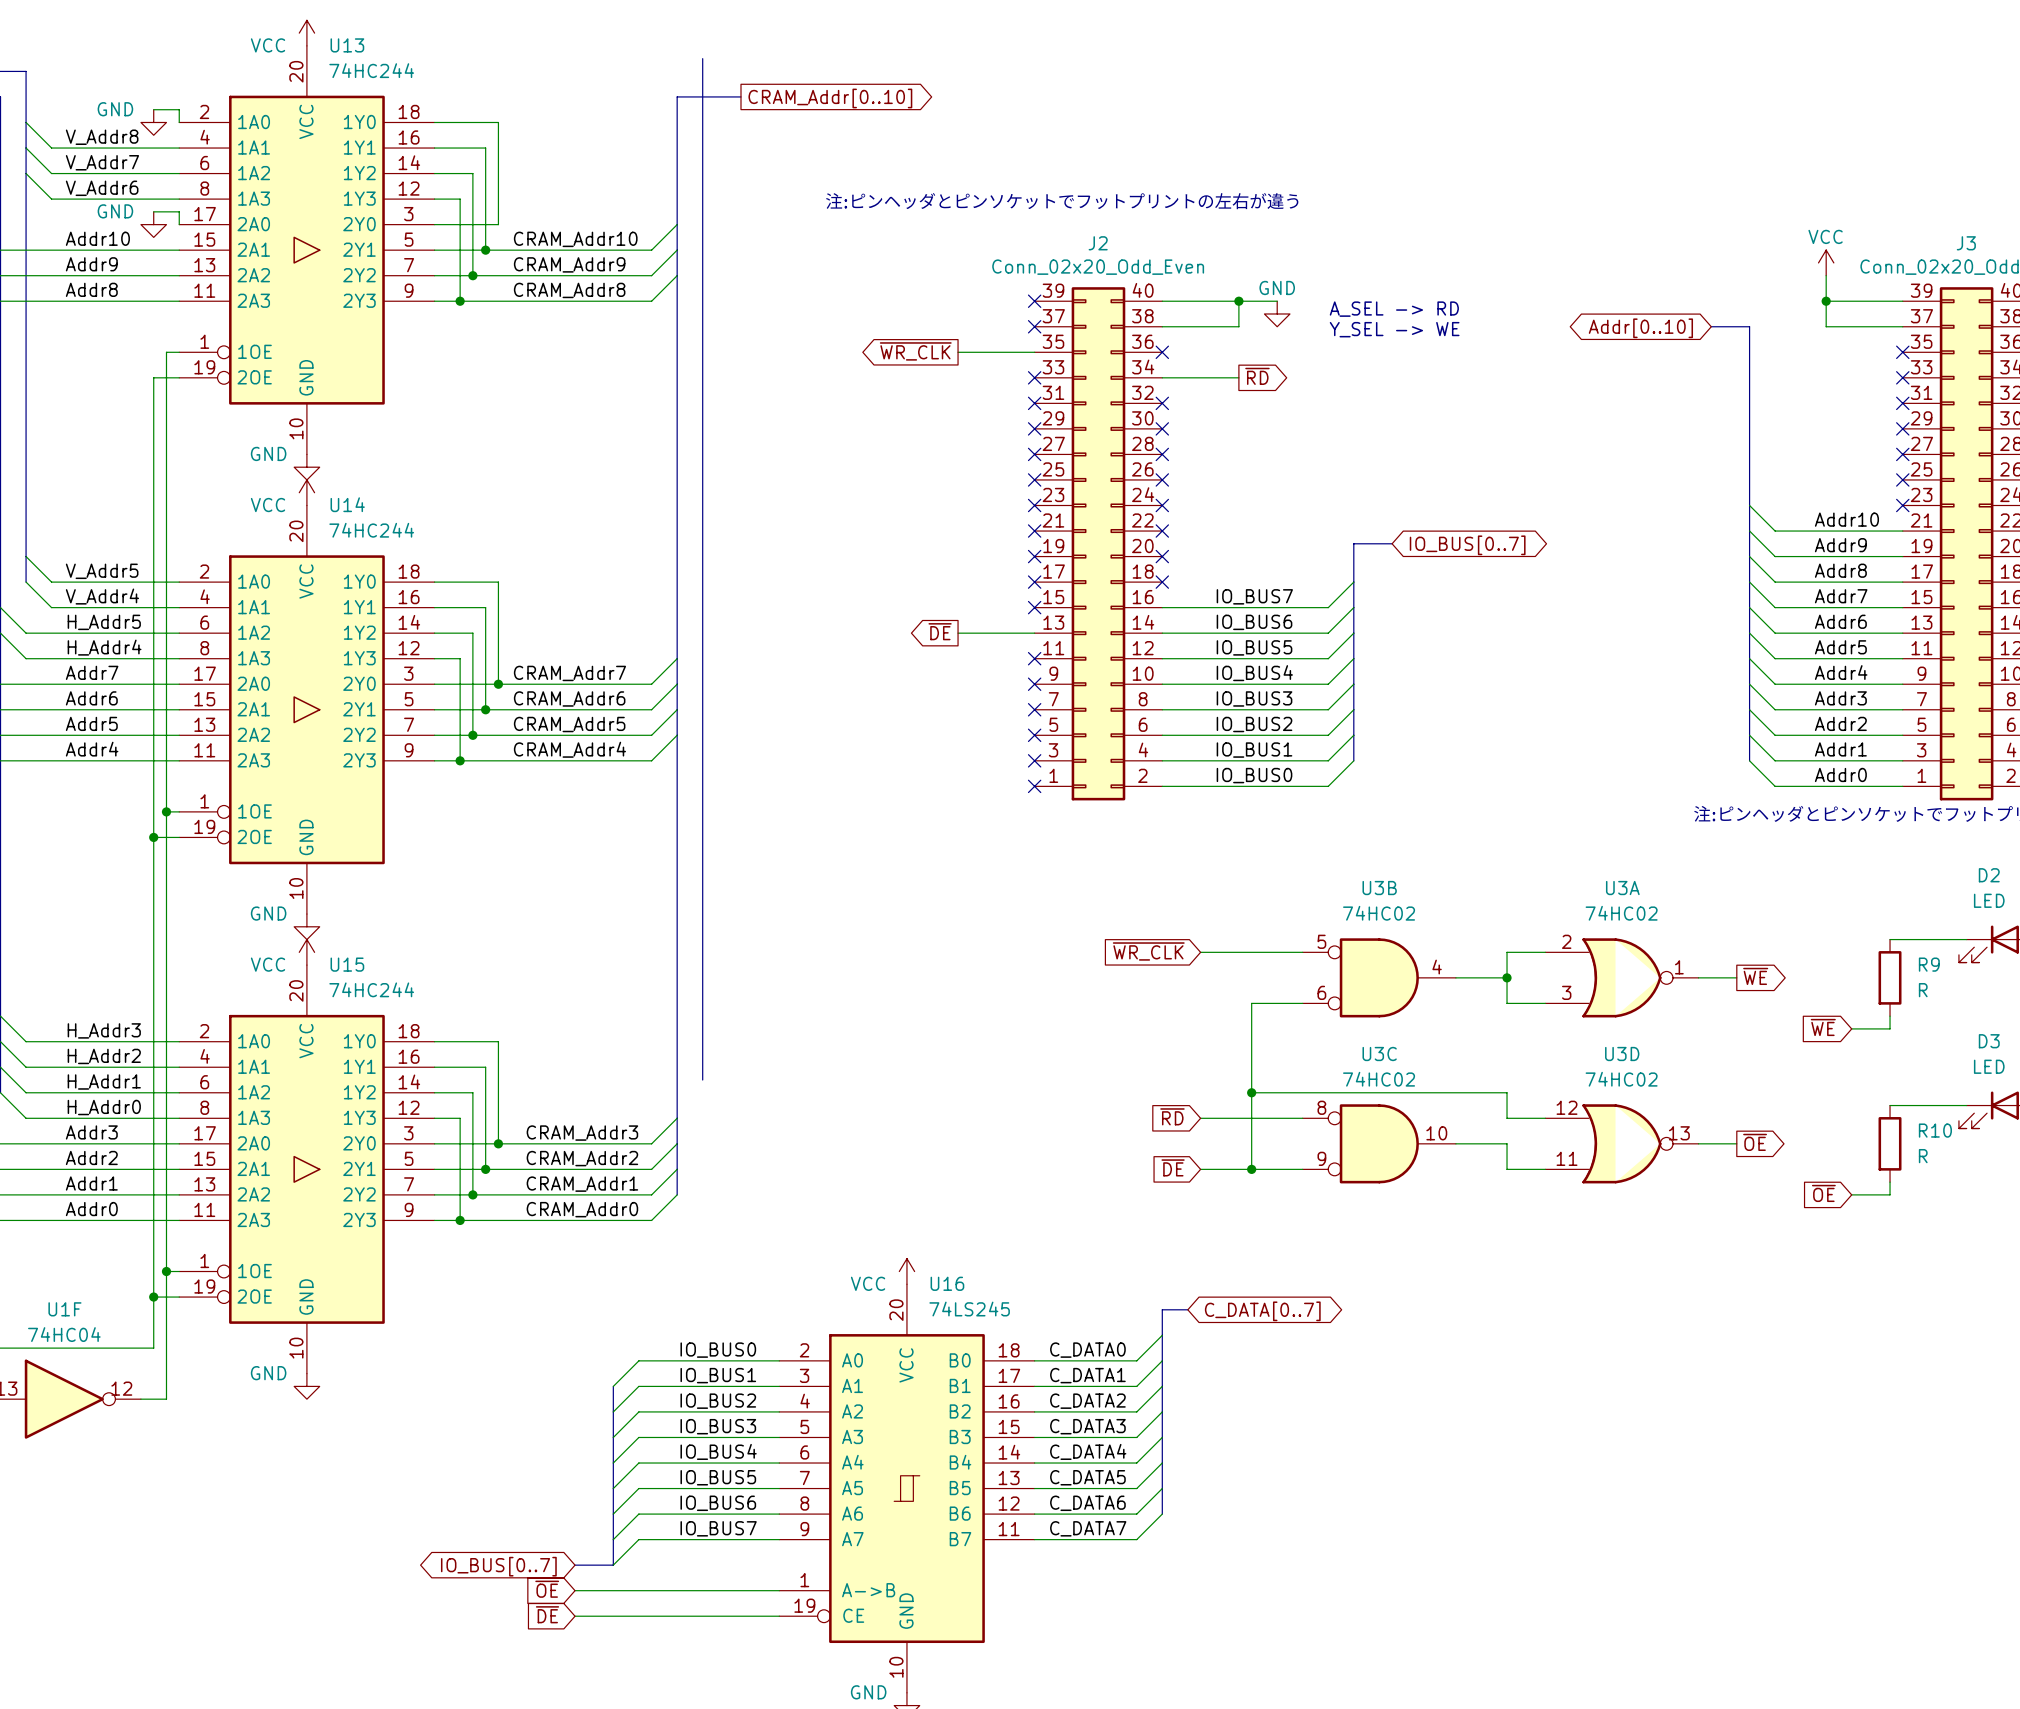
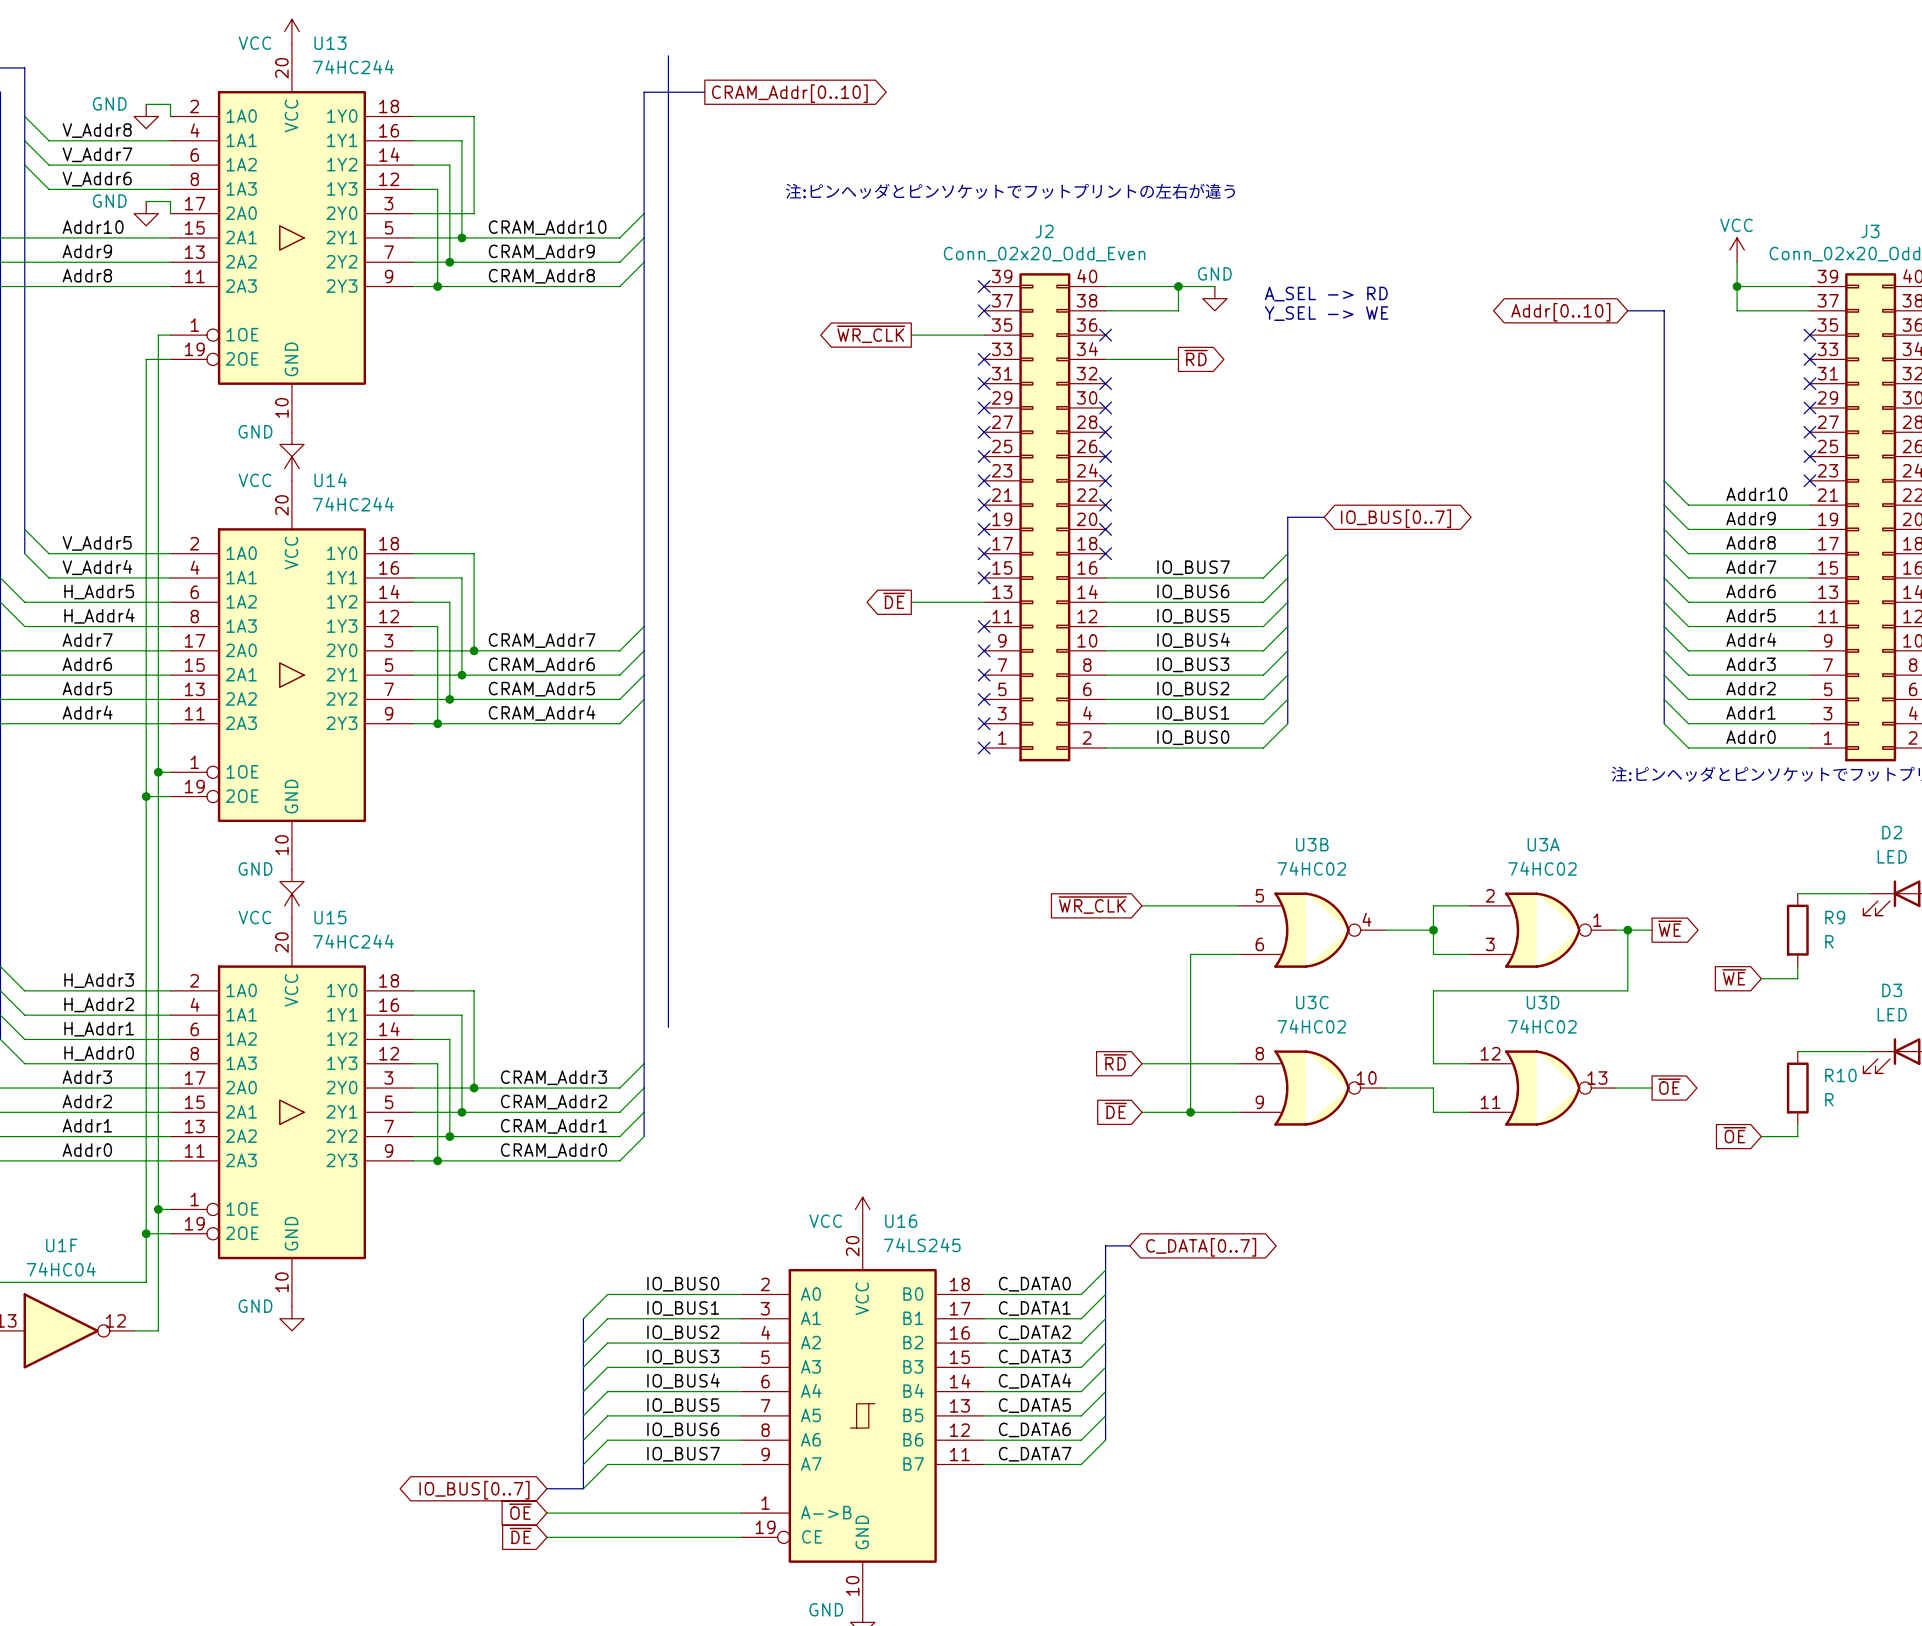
U3B symbol: [1302, 938, 1456, 1018] -> [1239, 892, 1385, 968]
junction: none -> (1627, 930)
wire: (1251, 1092) (1507, 1092) -> (1627, 930) (1627, 990) (1433, 990) (1433, 1039)
junction: (1251, 1092) -> none
U3C symbol: [1302, 1104, 1456, 1184] -> [1239, 1050, 1385, 1126]

